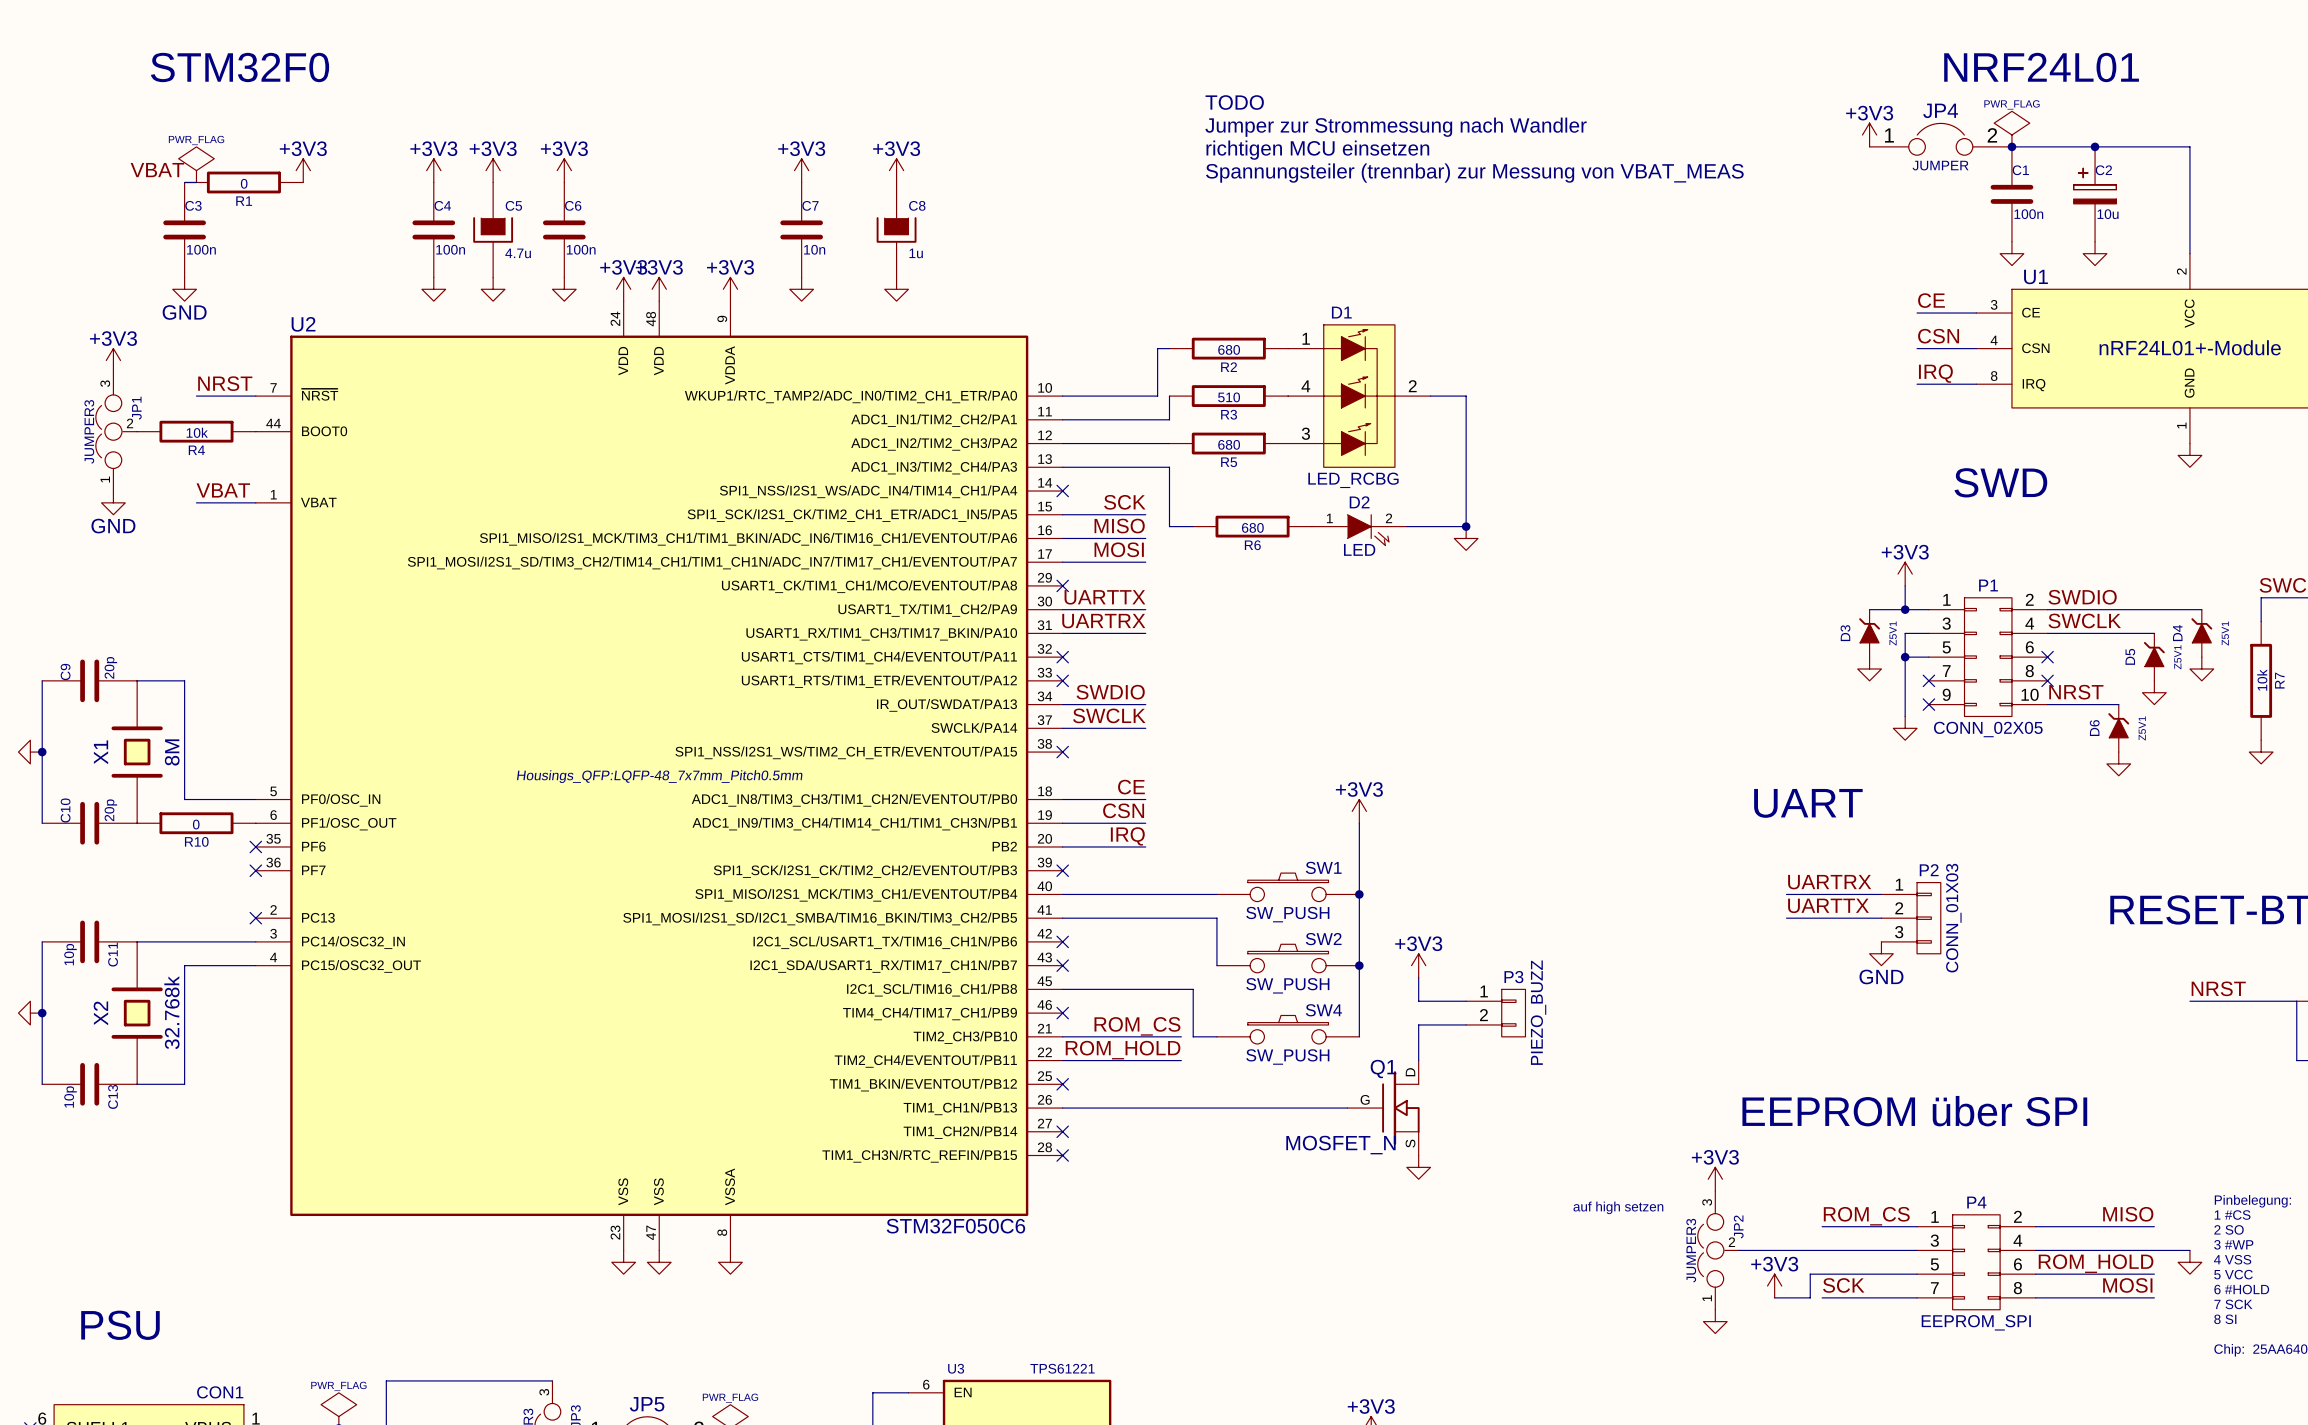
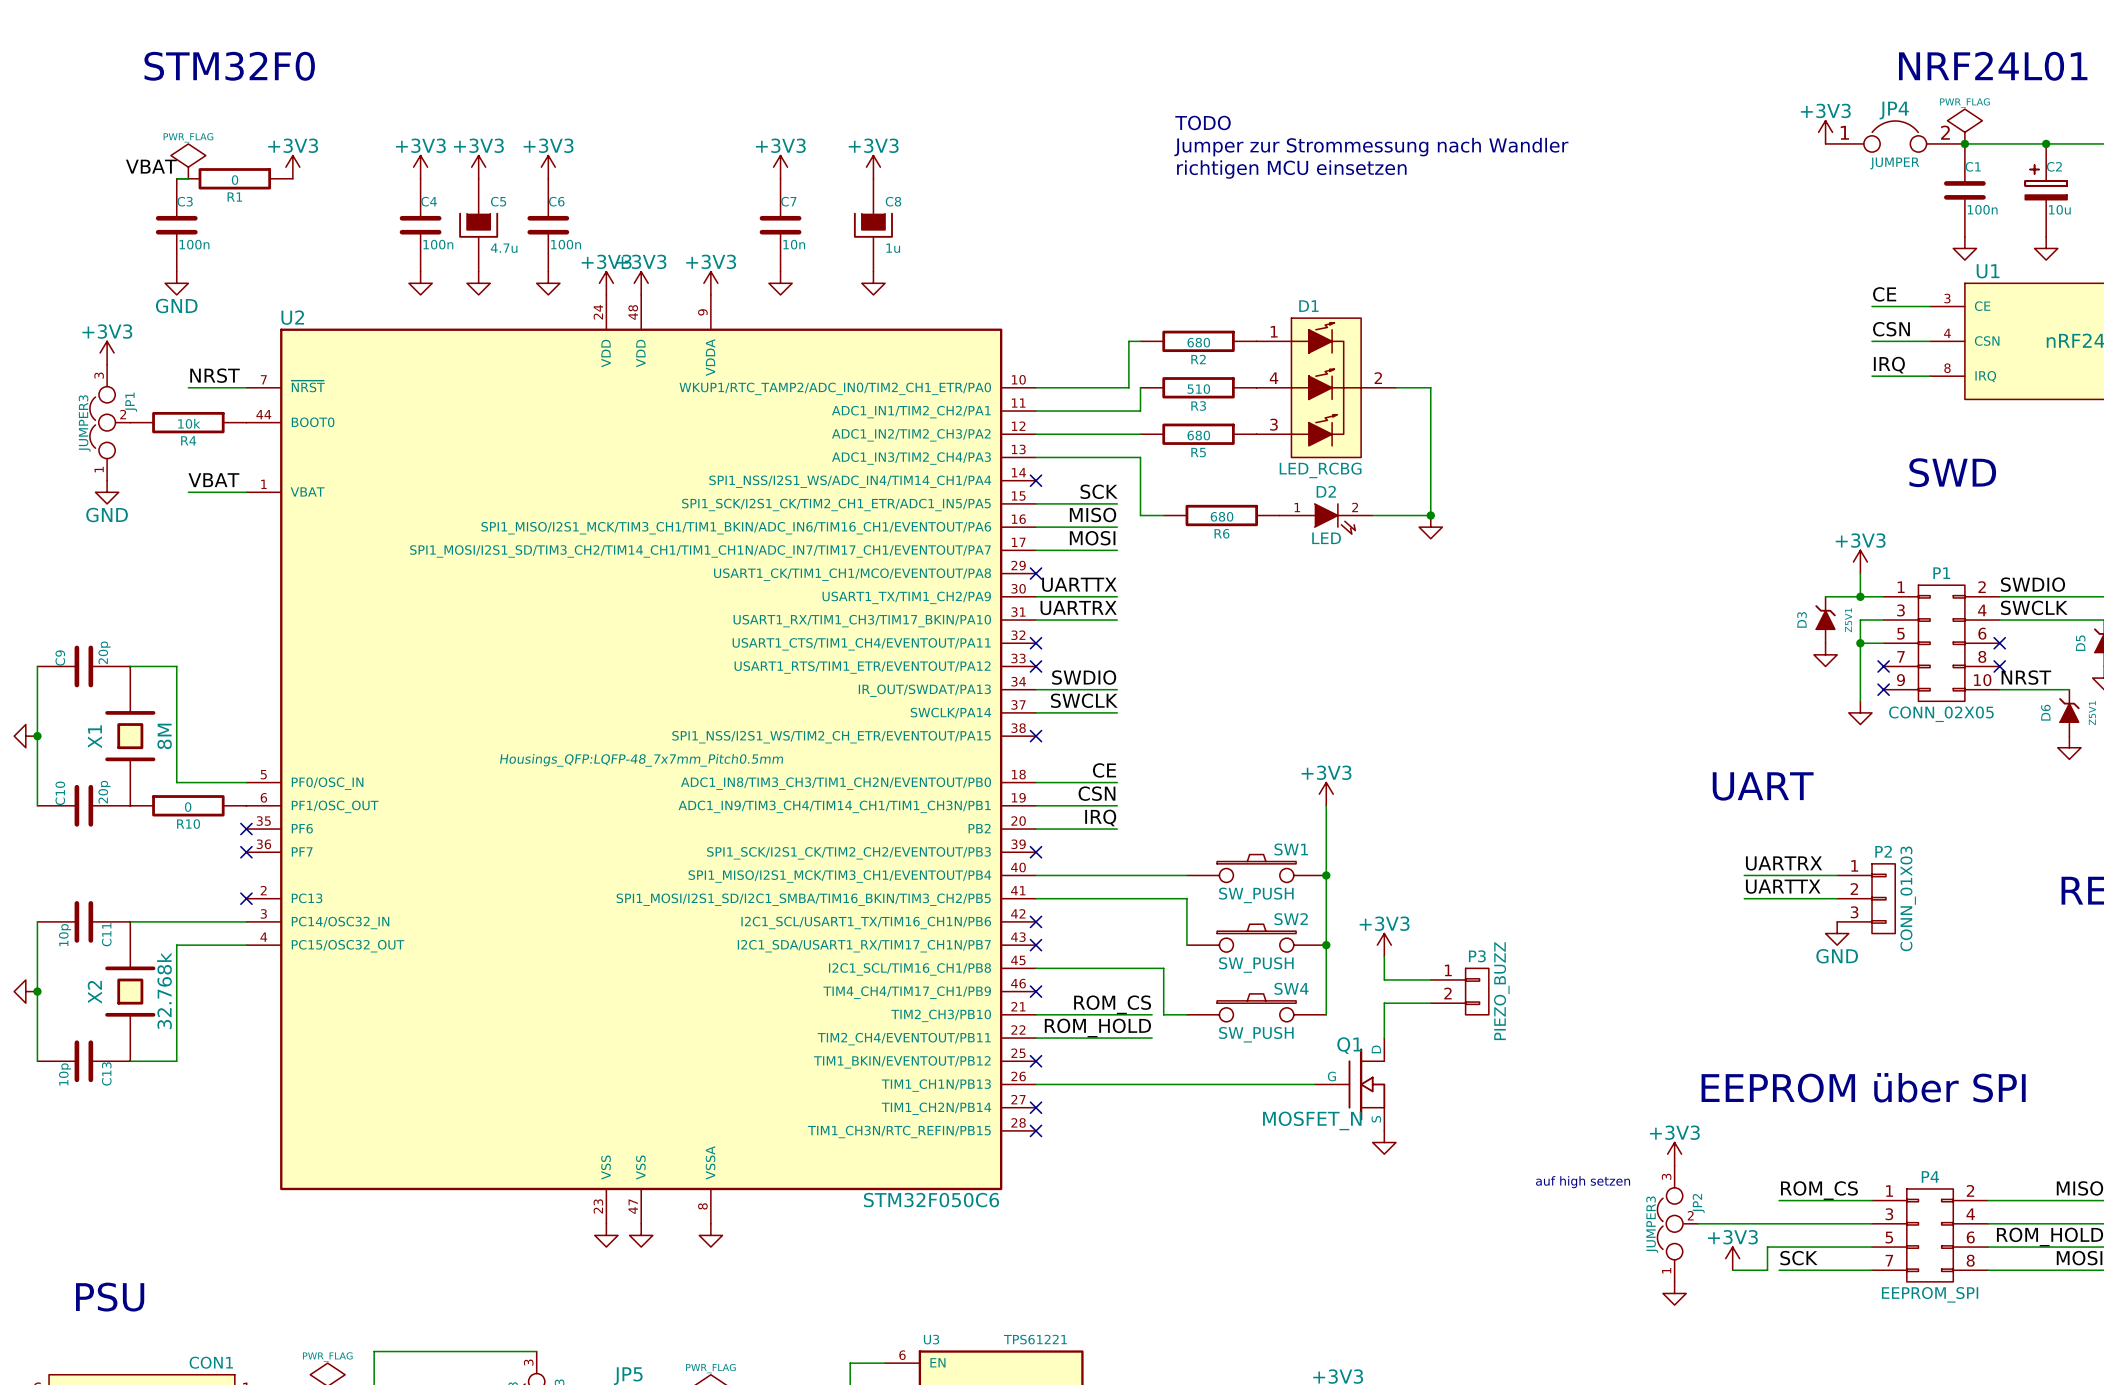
text: TODO (1234, 102) -> none
text: Jumper zur Strommessung nach Wandler (1396, 127) -> TODO (1203, 122)
text: richtigen MCU einsetzen (1317, 150) -> Jumper zur Strommessung nach Wandler (1371, 147)
text: Spannungsteiler (trennbar) zur Messung von VBAT_MEAS (1474, 173) -> richtigen MCU einsetzen (1291, 169)

